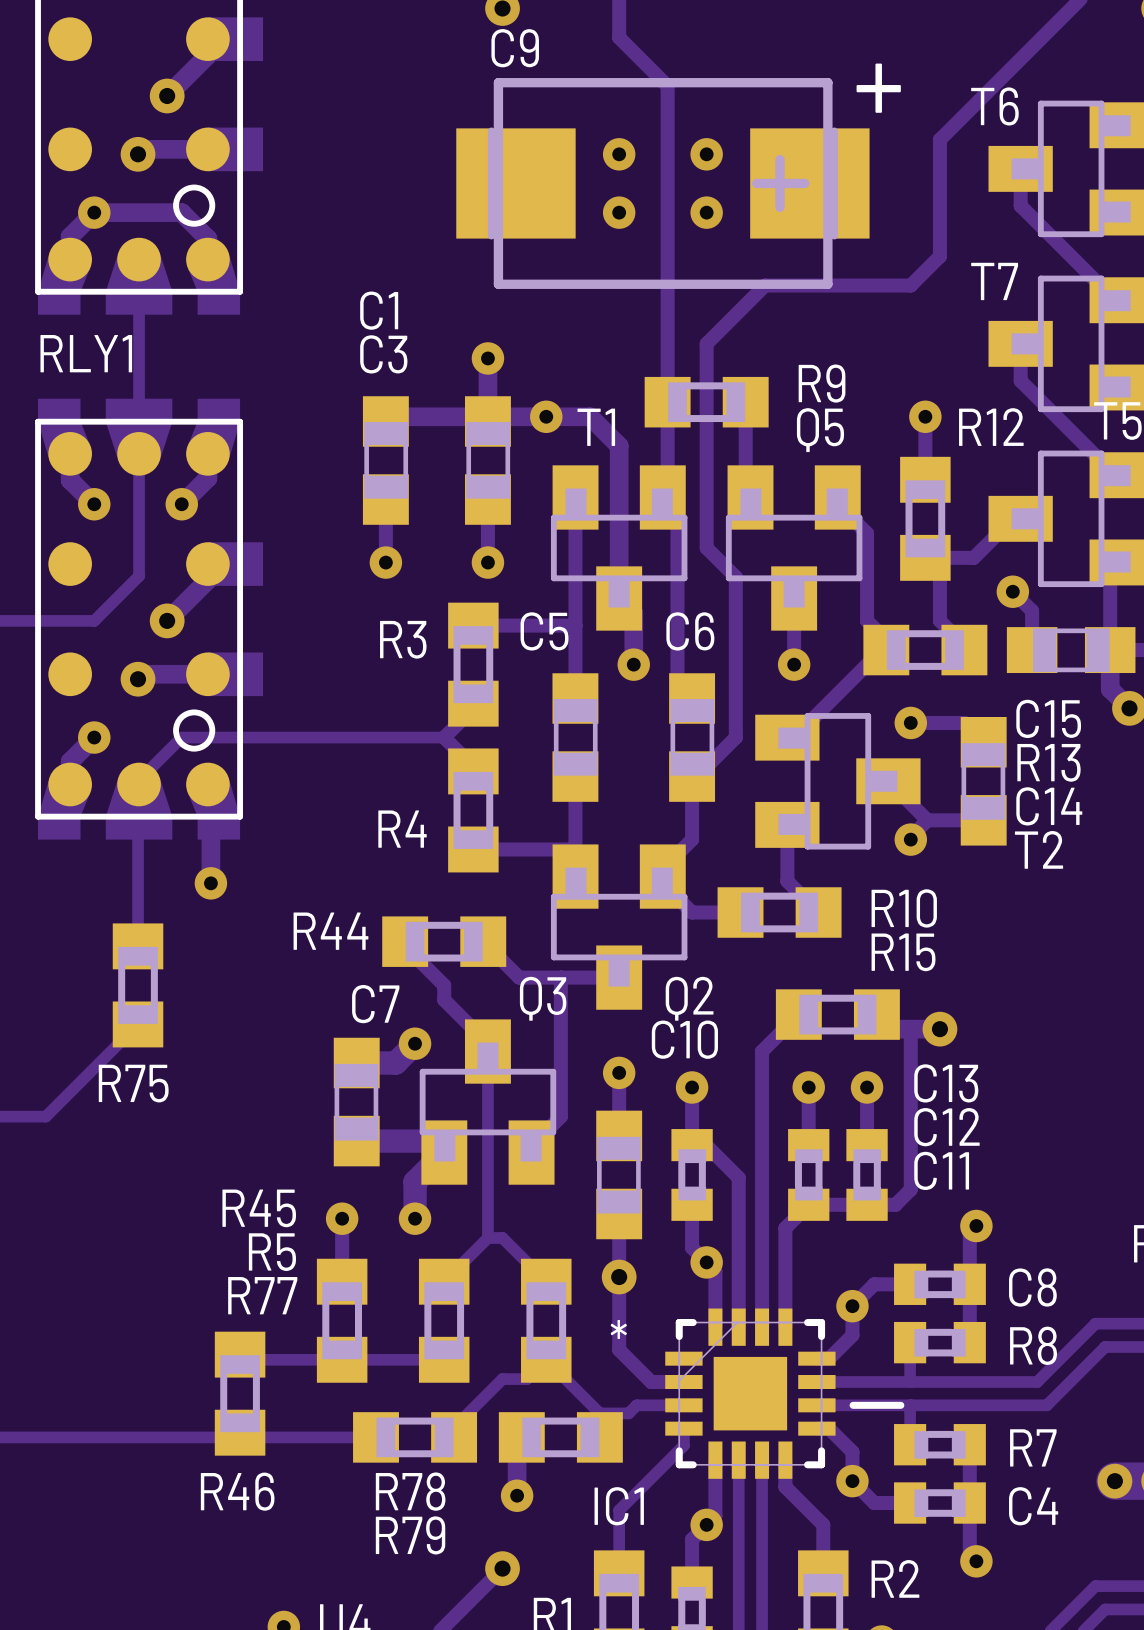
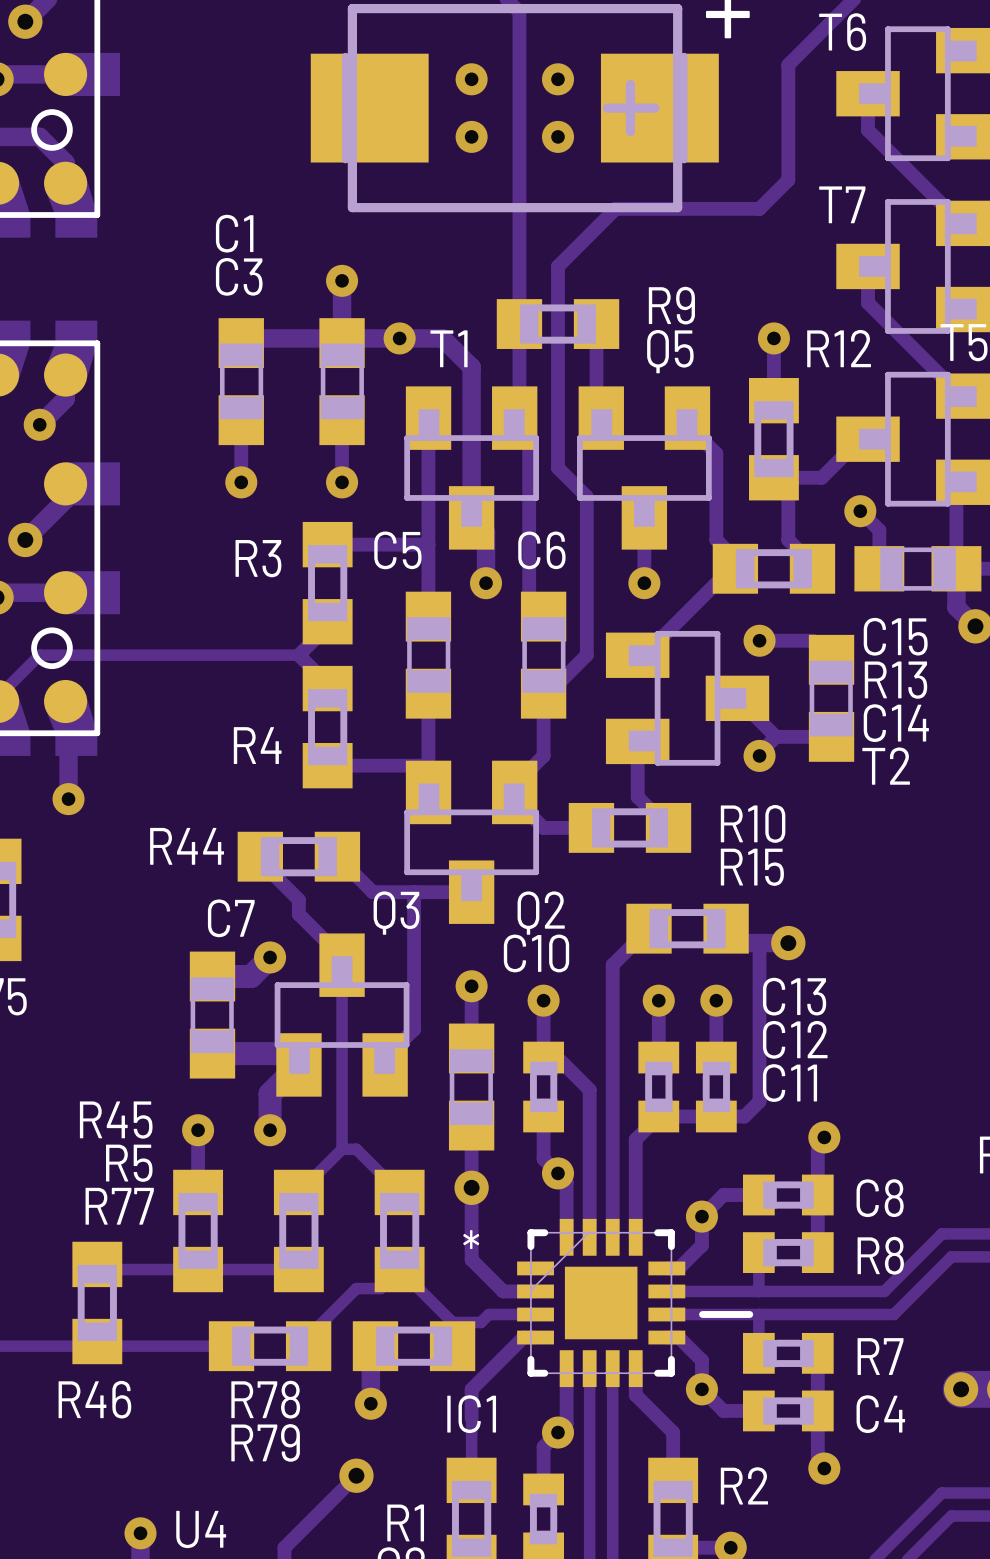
track: (683, 1428) (683, 1445) (619, 1510) -> (535, 1337) (523, 1337) (471, 1389) (471, 1418)

